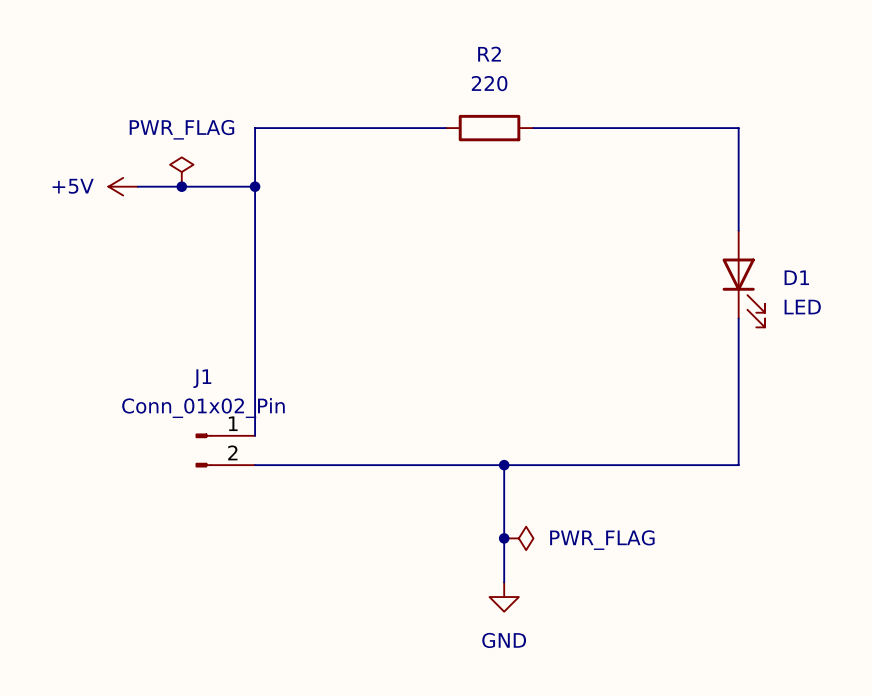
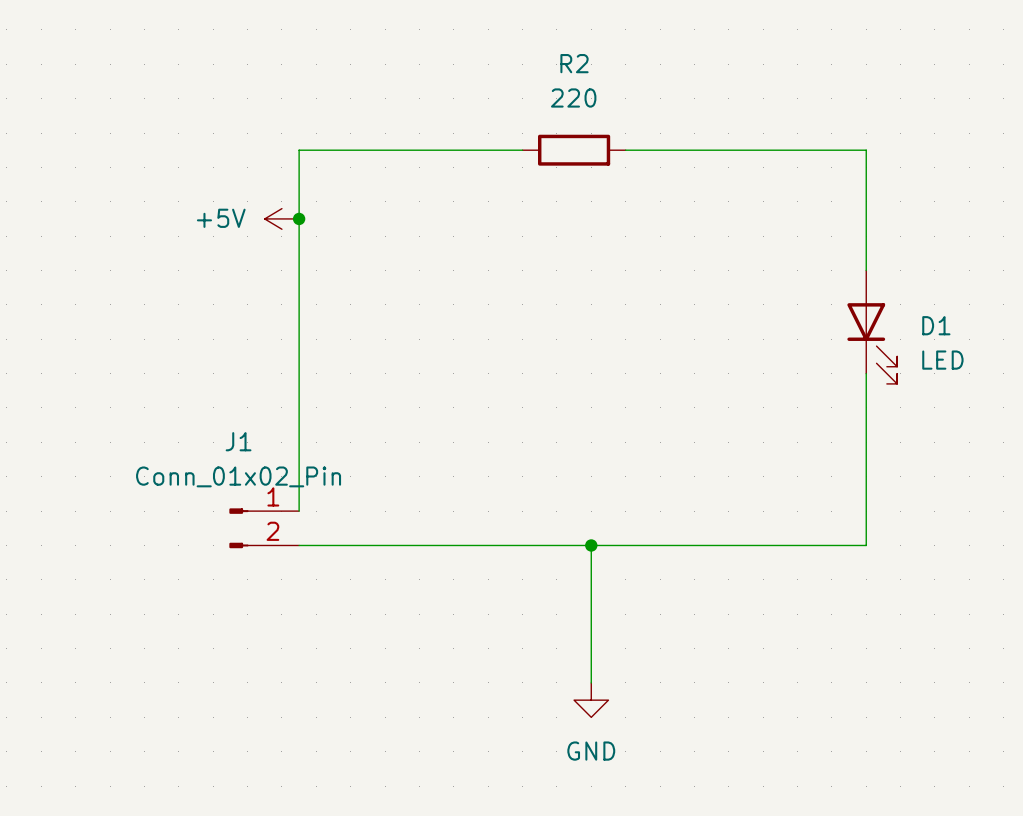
power symbol: PWR_FLAG (181, 172) -> none
power symbol position: +5V (123, 186) -> +5V (281, 218)
wire: (137, 186) (255, 186) -> none
junction: (181, 186) -> none
junction: (504, 538) -> none
power symbol: PWR_FLAG (518, 538) -> none

